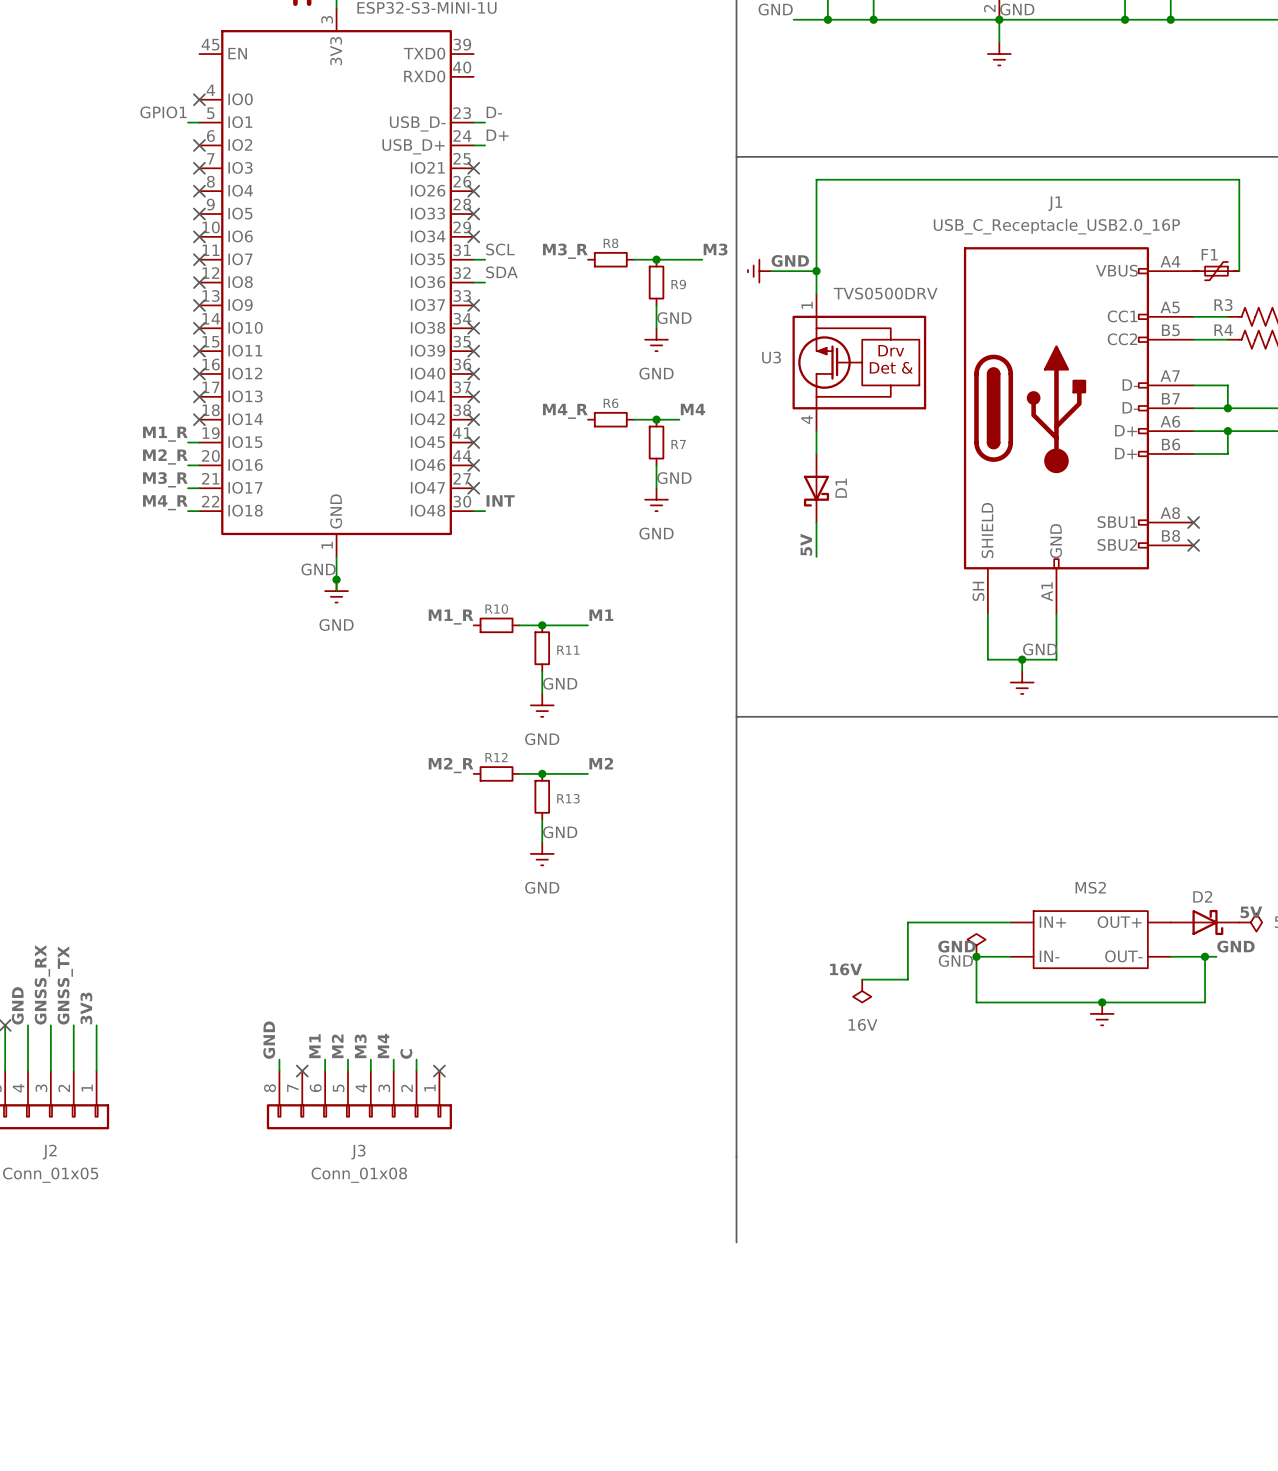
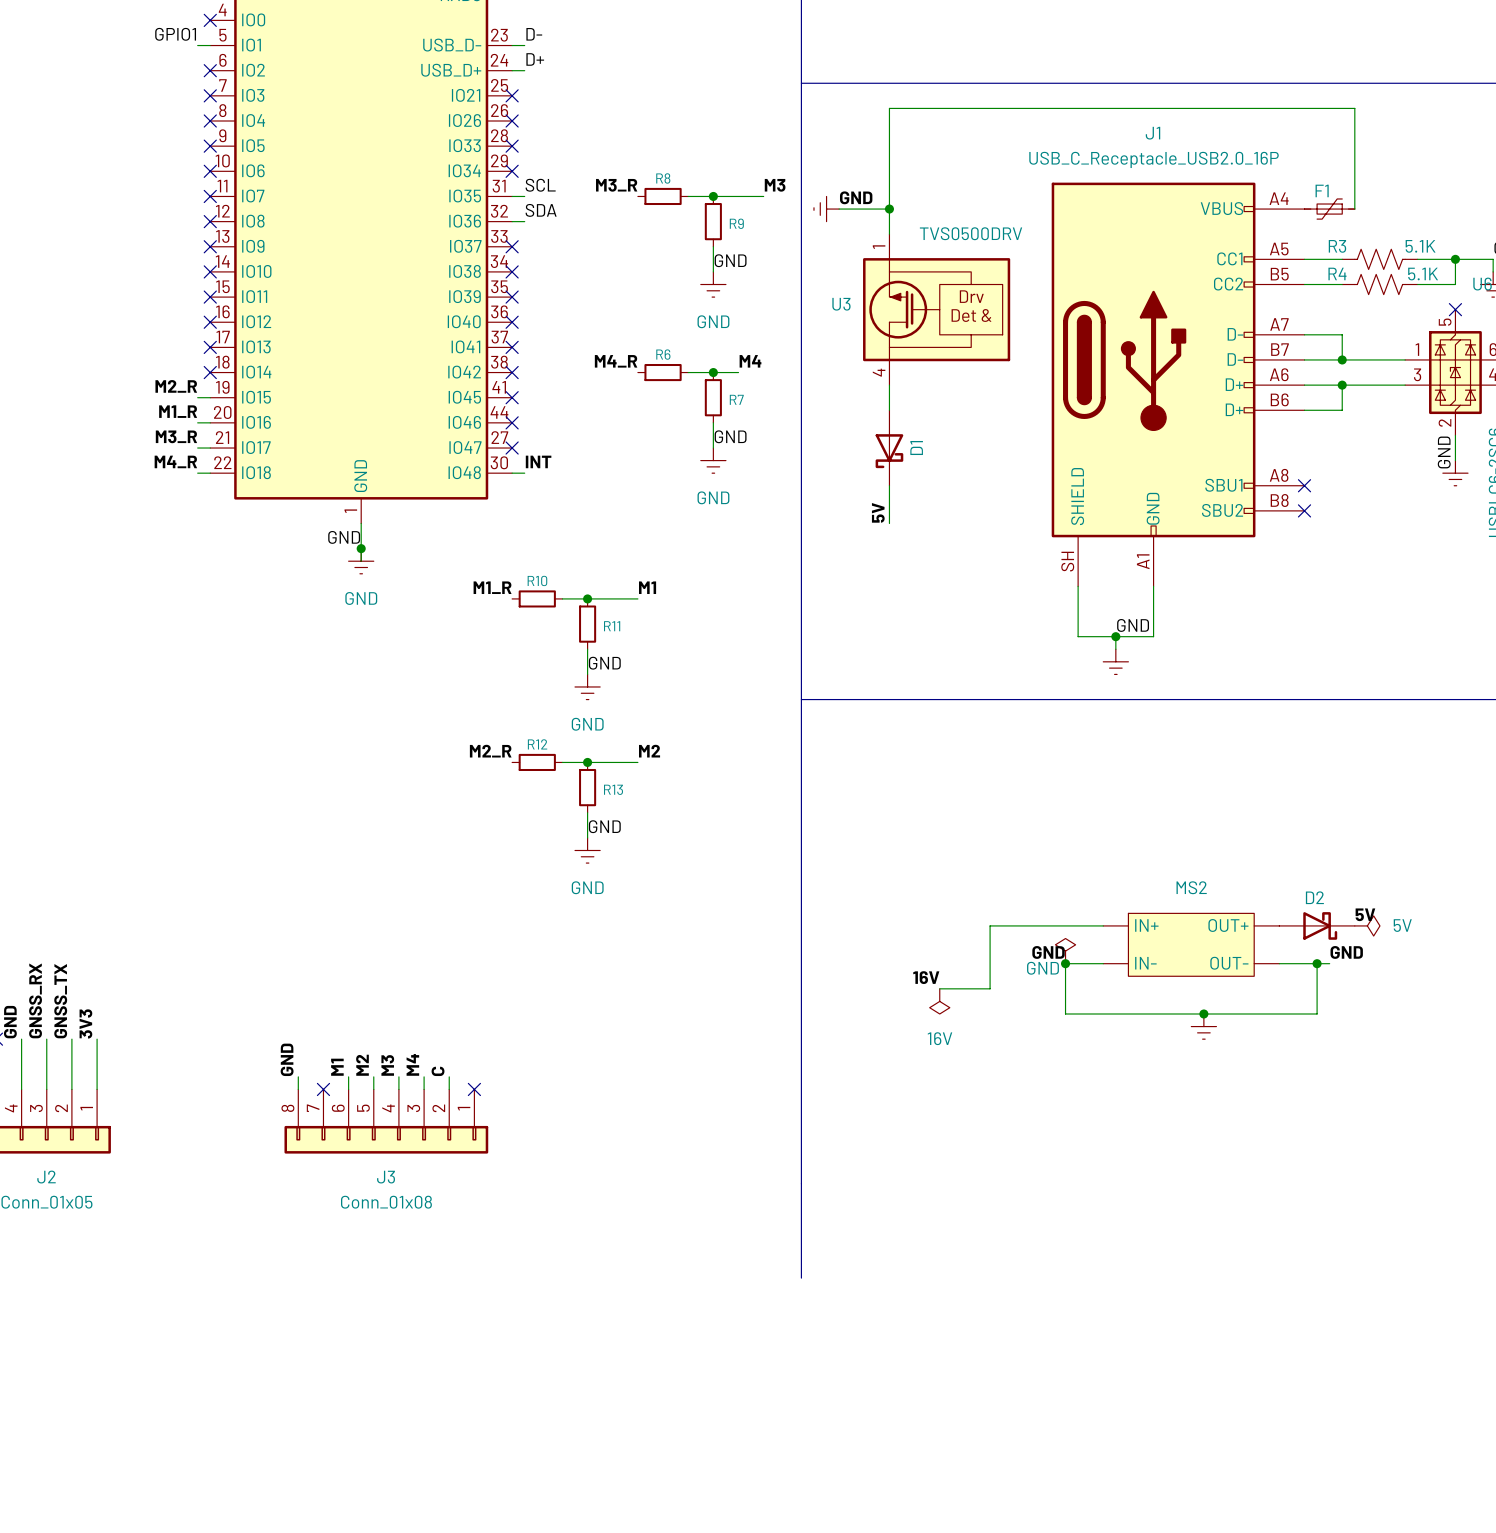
label: M1_R (165, 434) -> M2_R (176, 386)
label: M2_R (165, 456) -> M1_R (178, 411)

